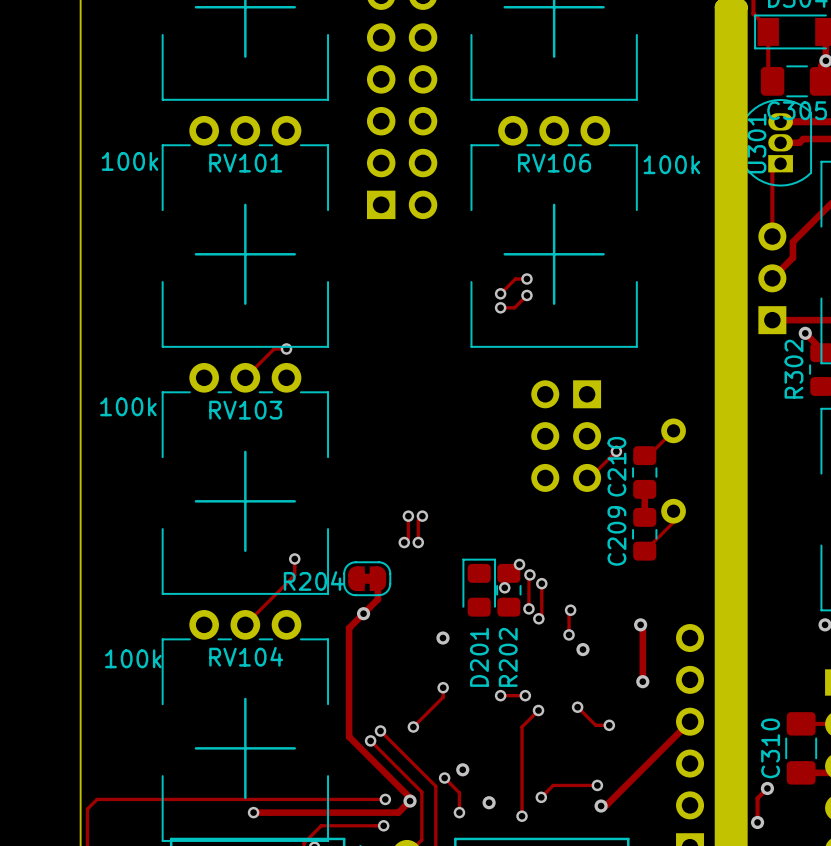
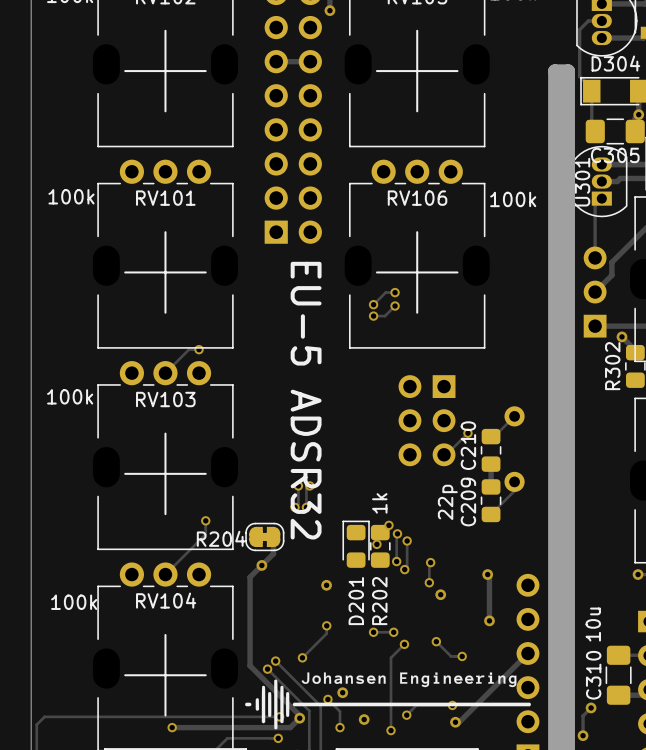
text: none -> EU-5 ADSR32 (306, 400)
C209 value: none -> 22p (447, 502)
R202 value: none -> 1k (379, 503)
C310 value: none -> 10u (593, 624)
drawing: none -> [245, 672, 531, 730]

